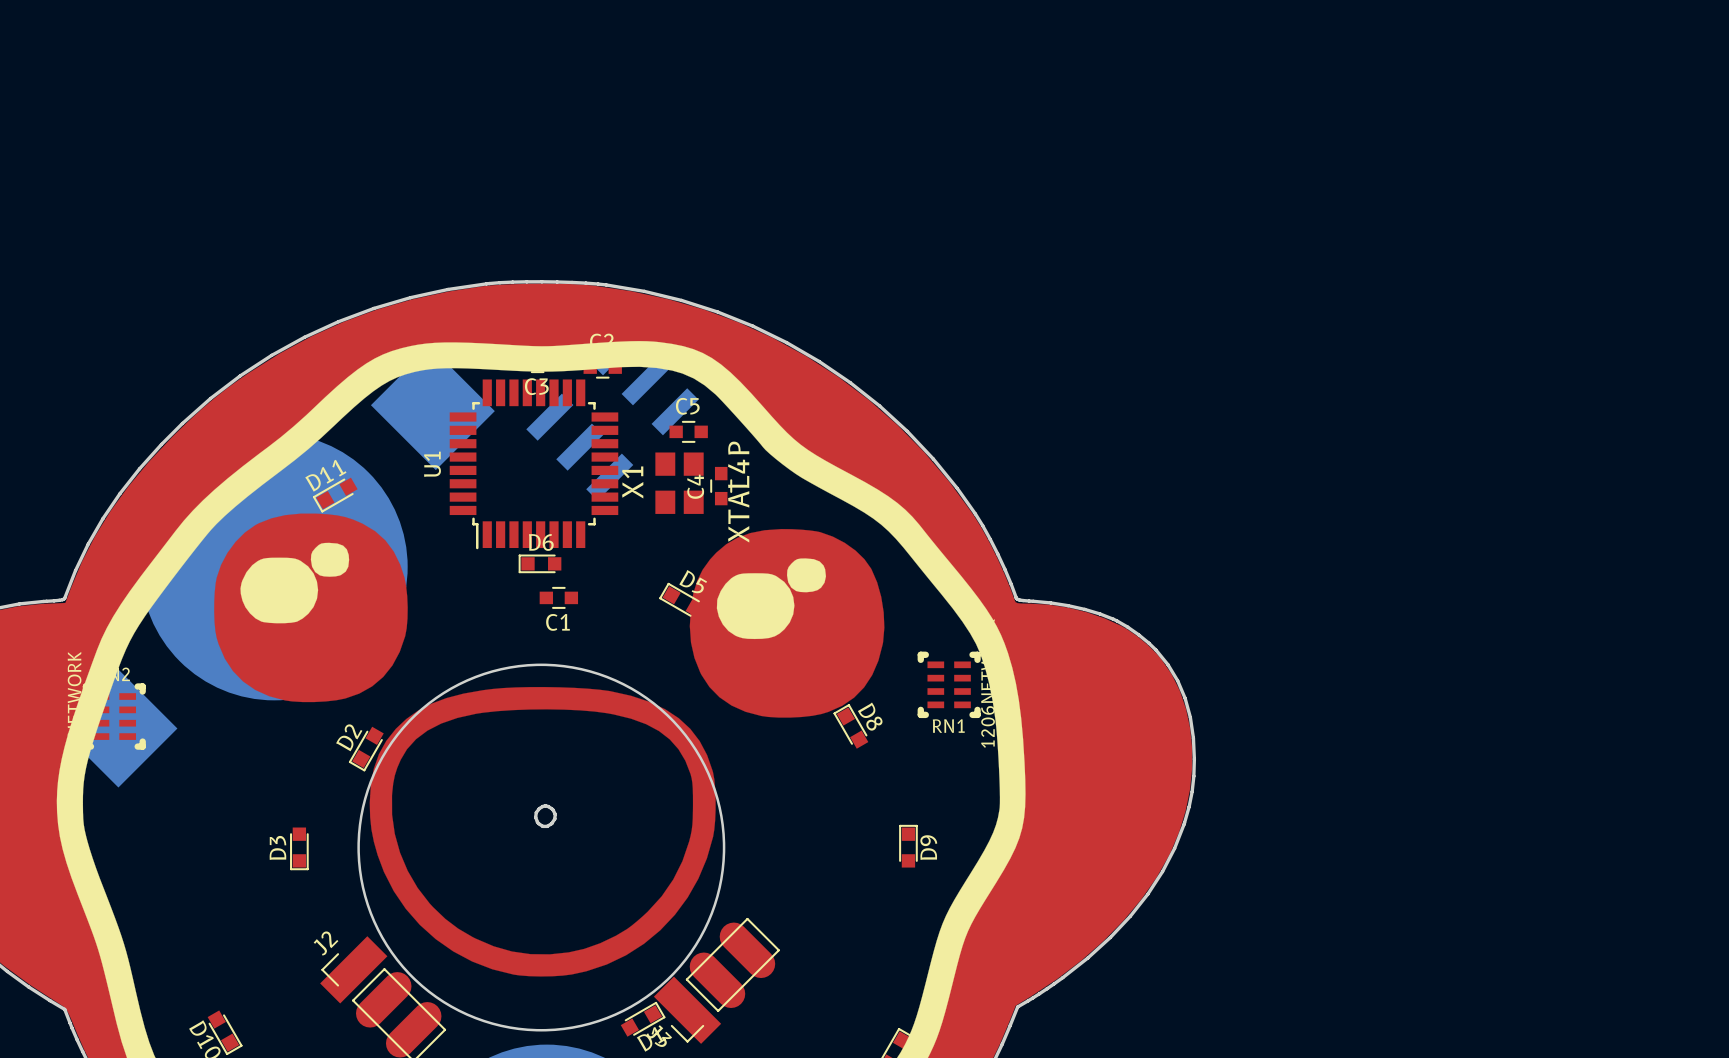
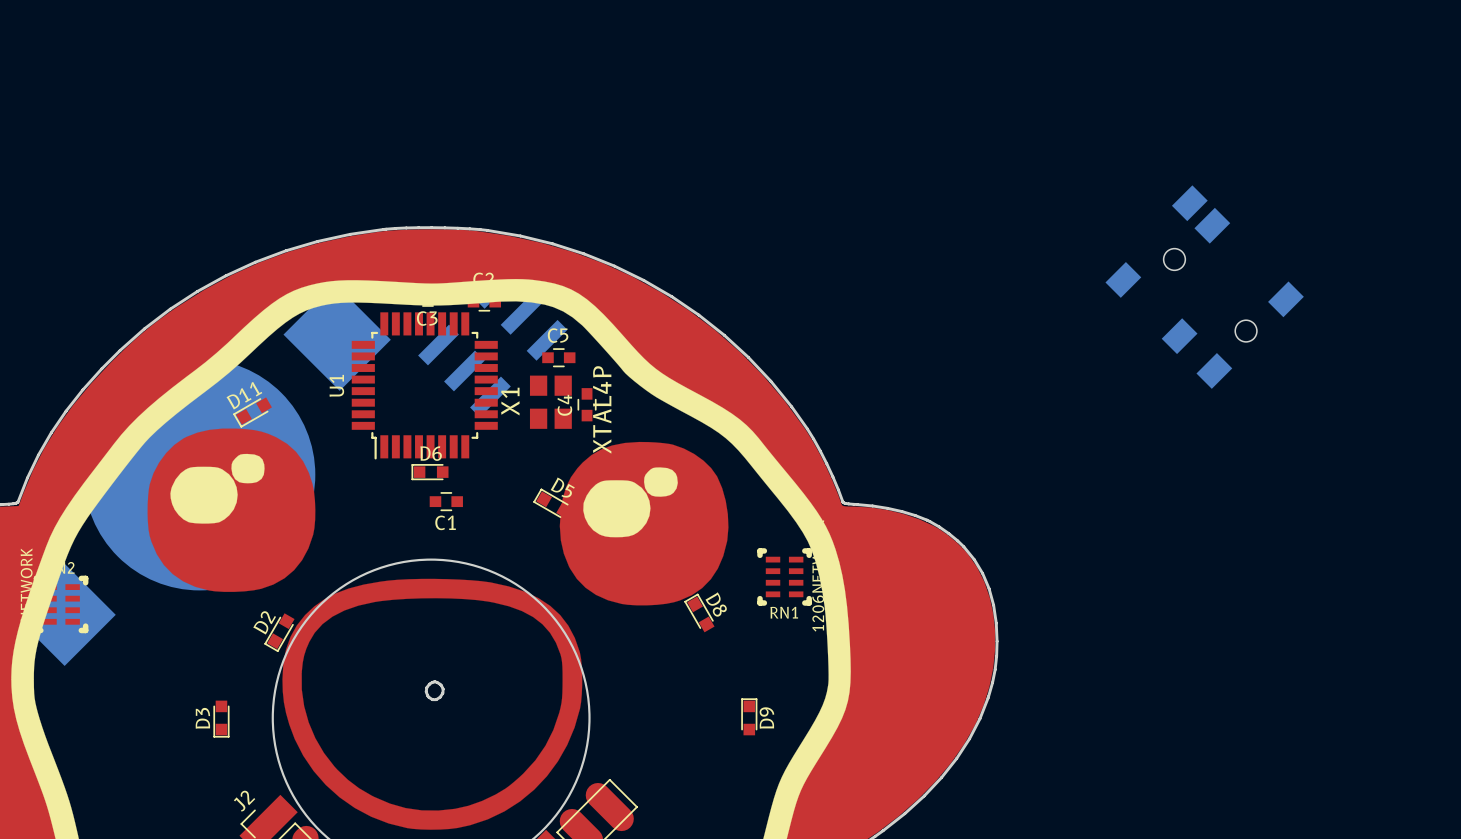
part: none -> (1204, 287)

